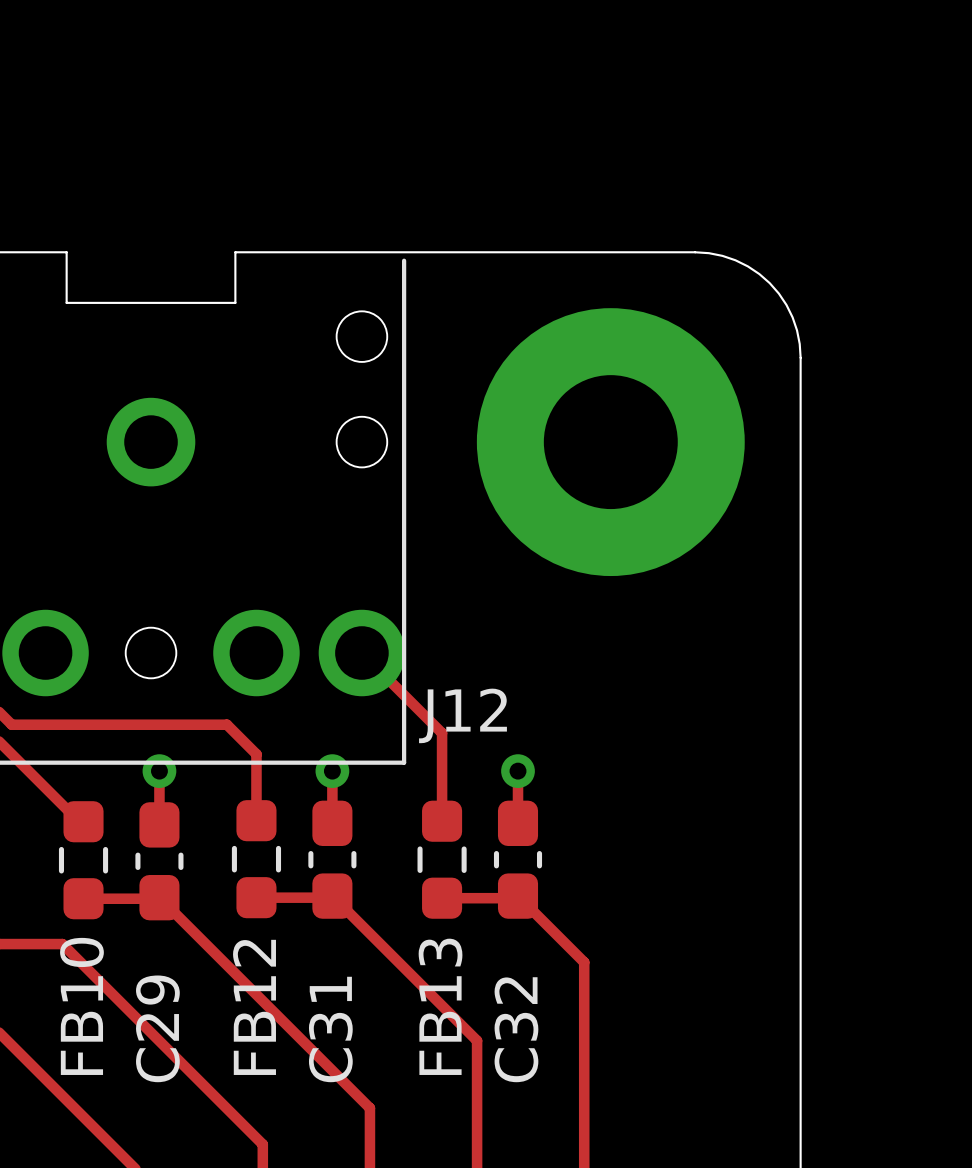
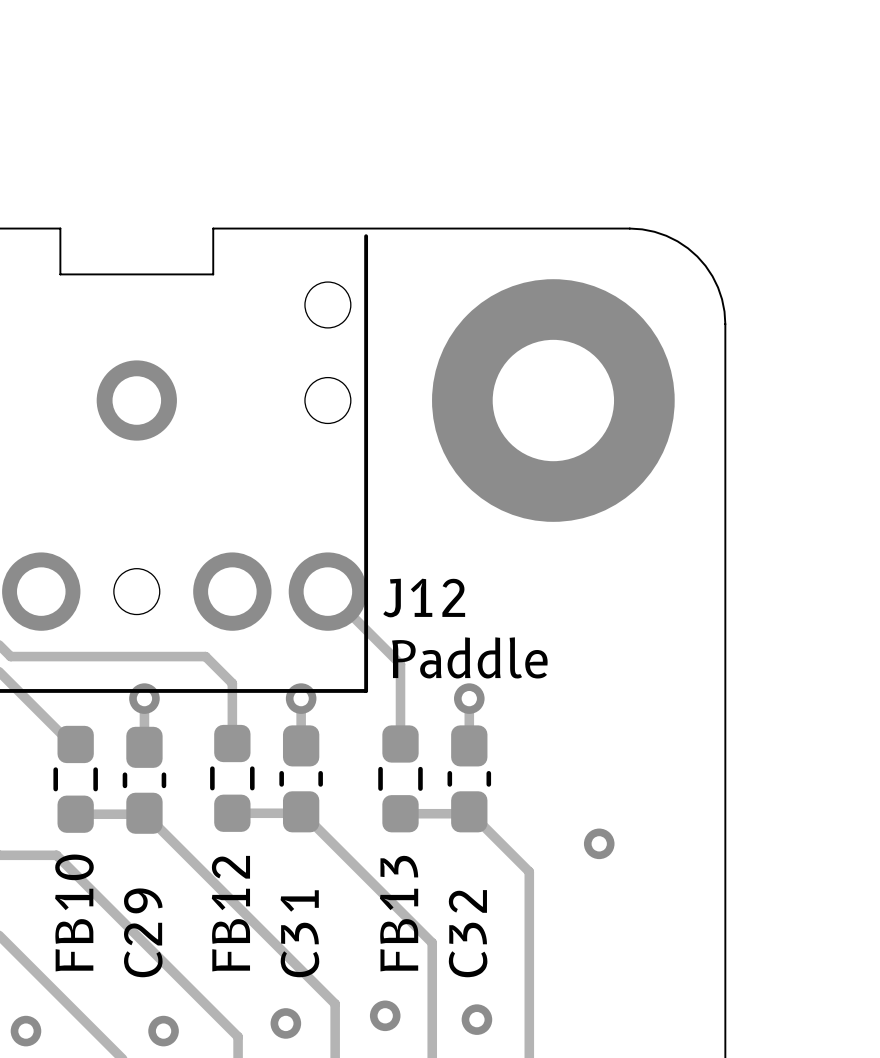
J12 name position: J12 (462, 715) -> J12 (424, 598)
text: none -> Paddle (469, 657)
via: none -> (599, 843)
via: none -> (385, 1015)
via: none -> (476, 1019)
via: none -> (285, 1023)
via: none -> (25, 1031)
via: none -> (163, 1031)

